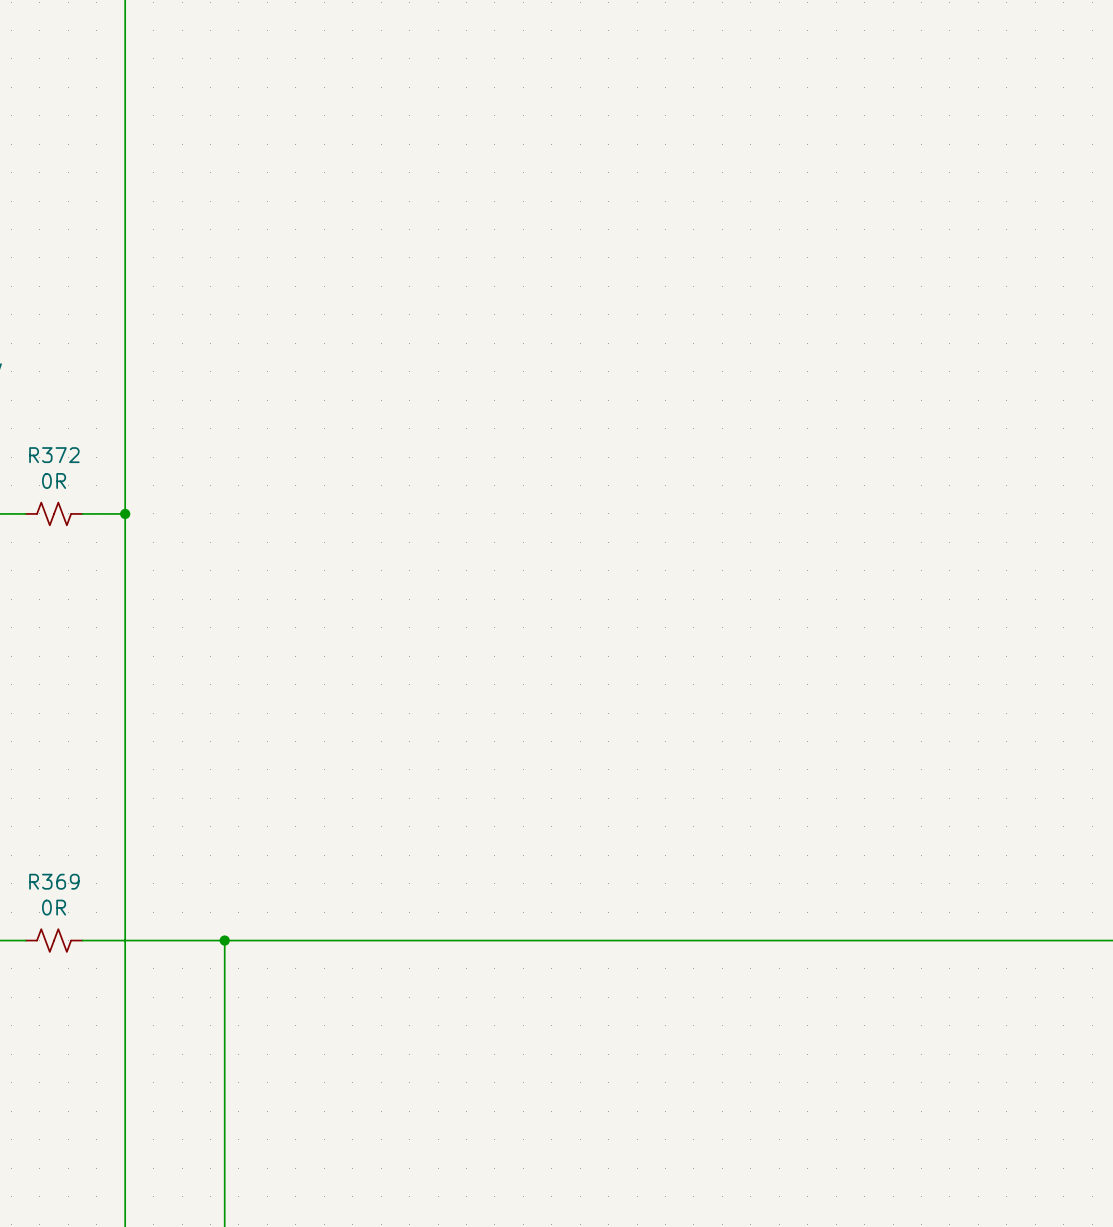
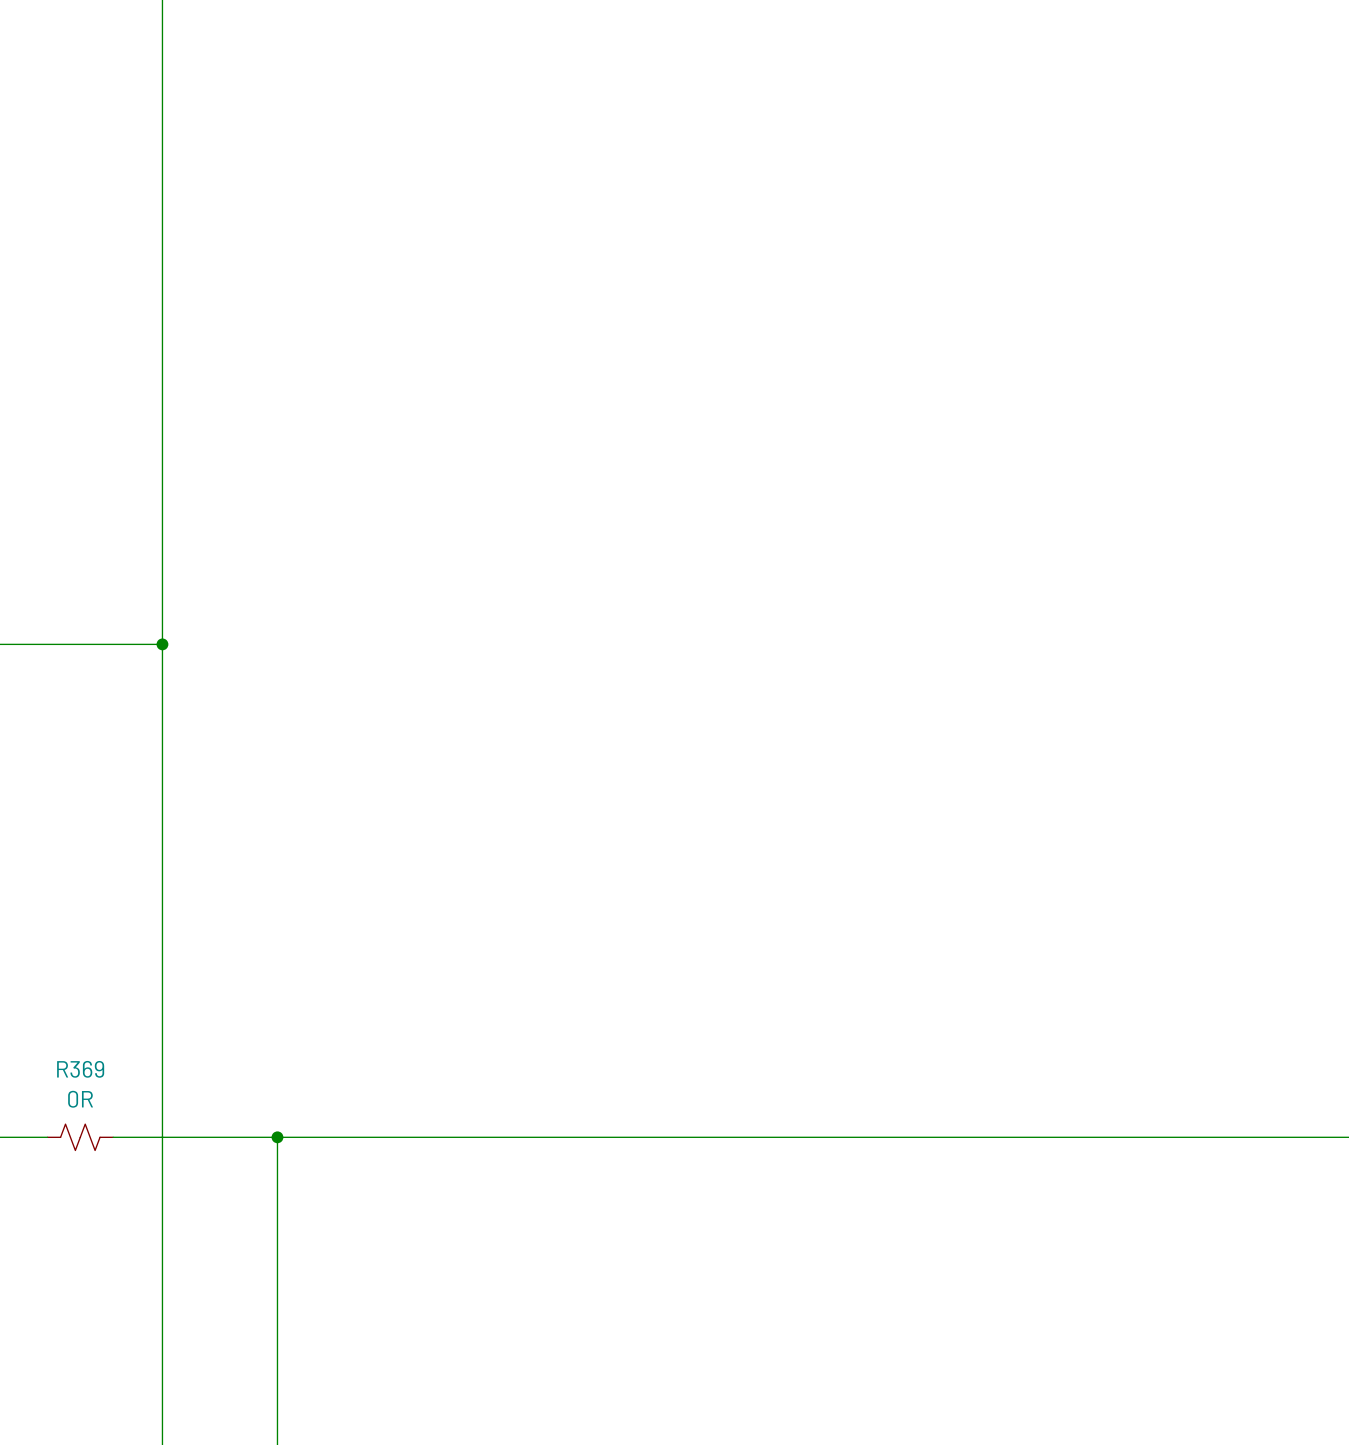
wire: none -> (47, 644) (113, 644)
R372: 0R (54, 513) -> none

